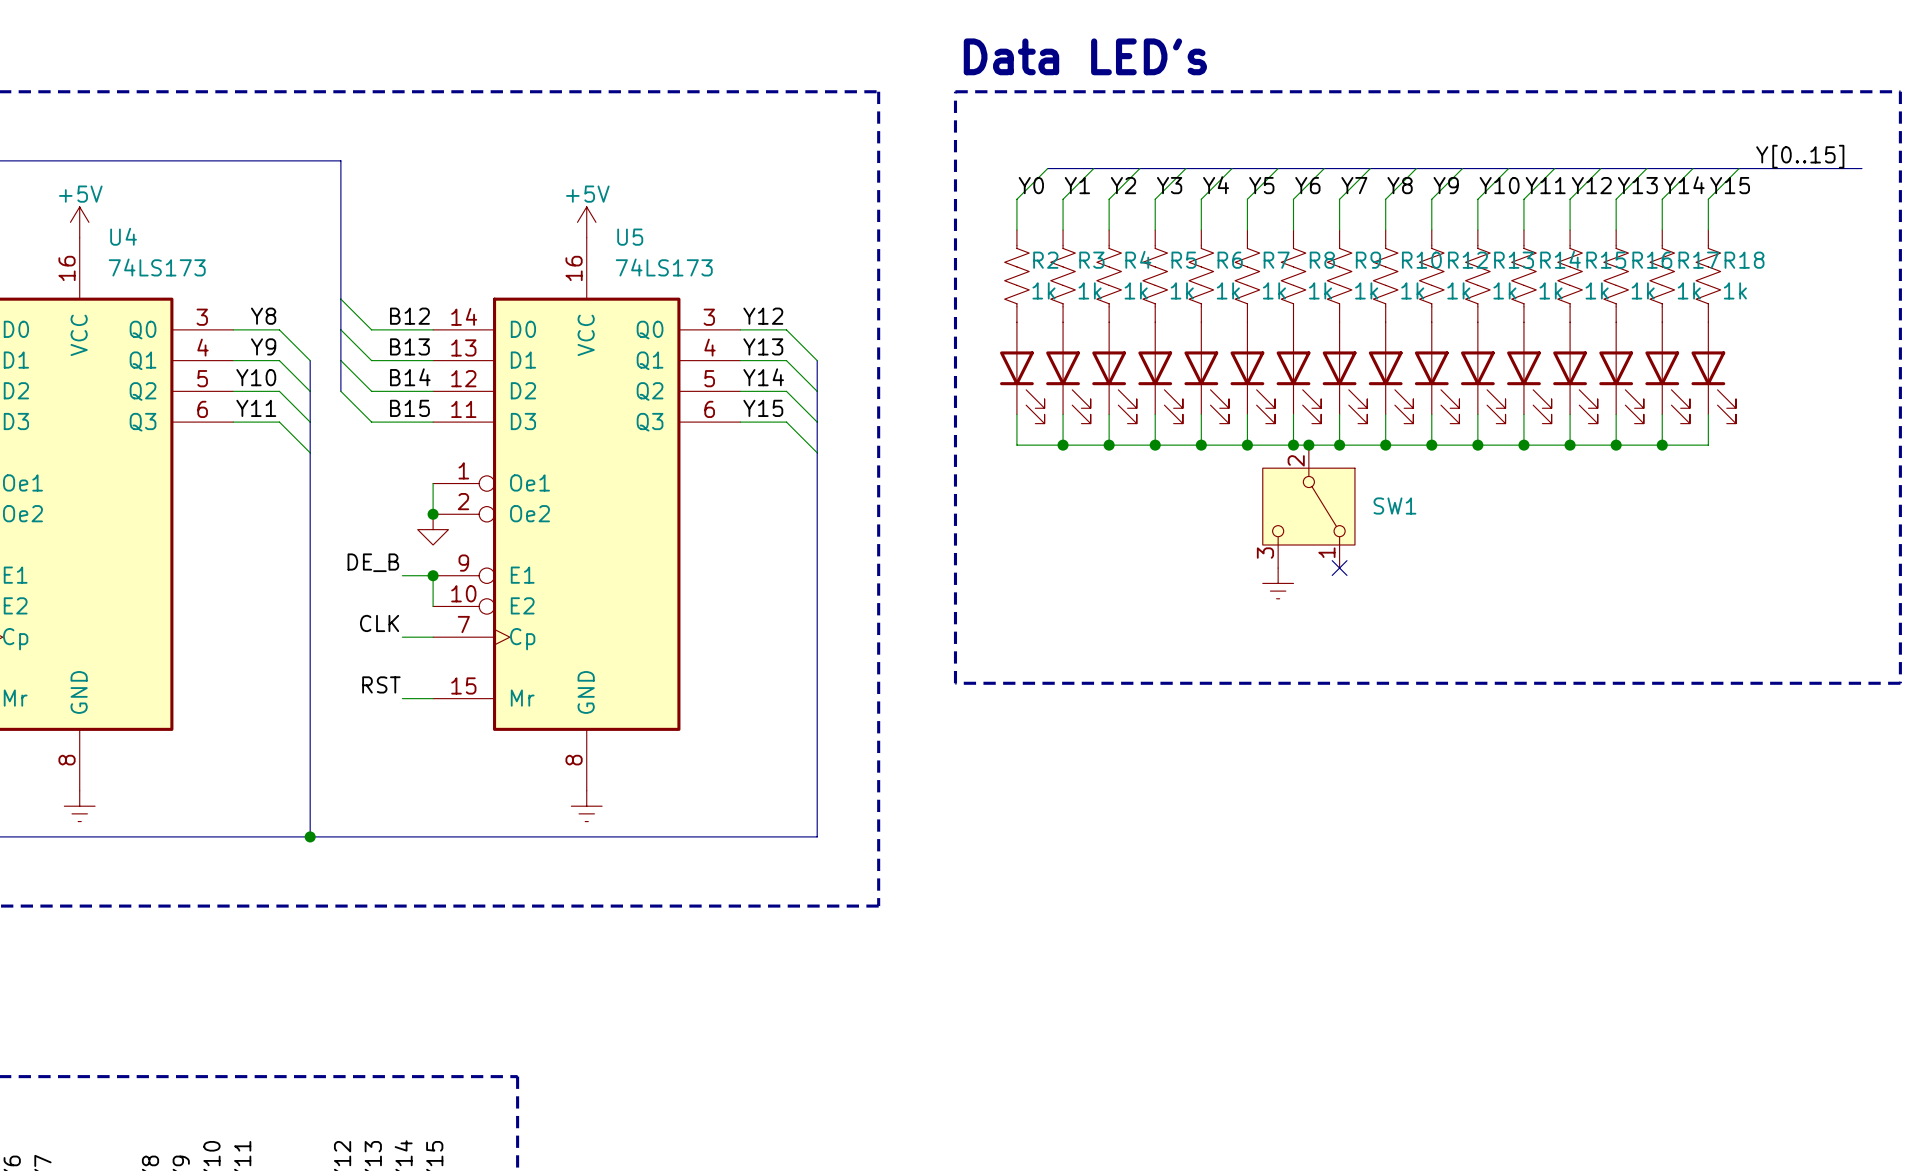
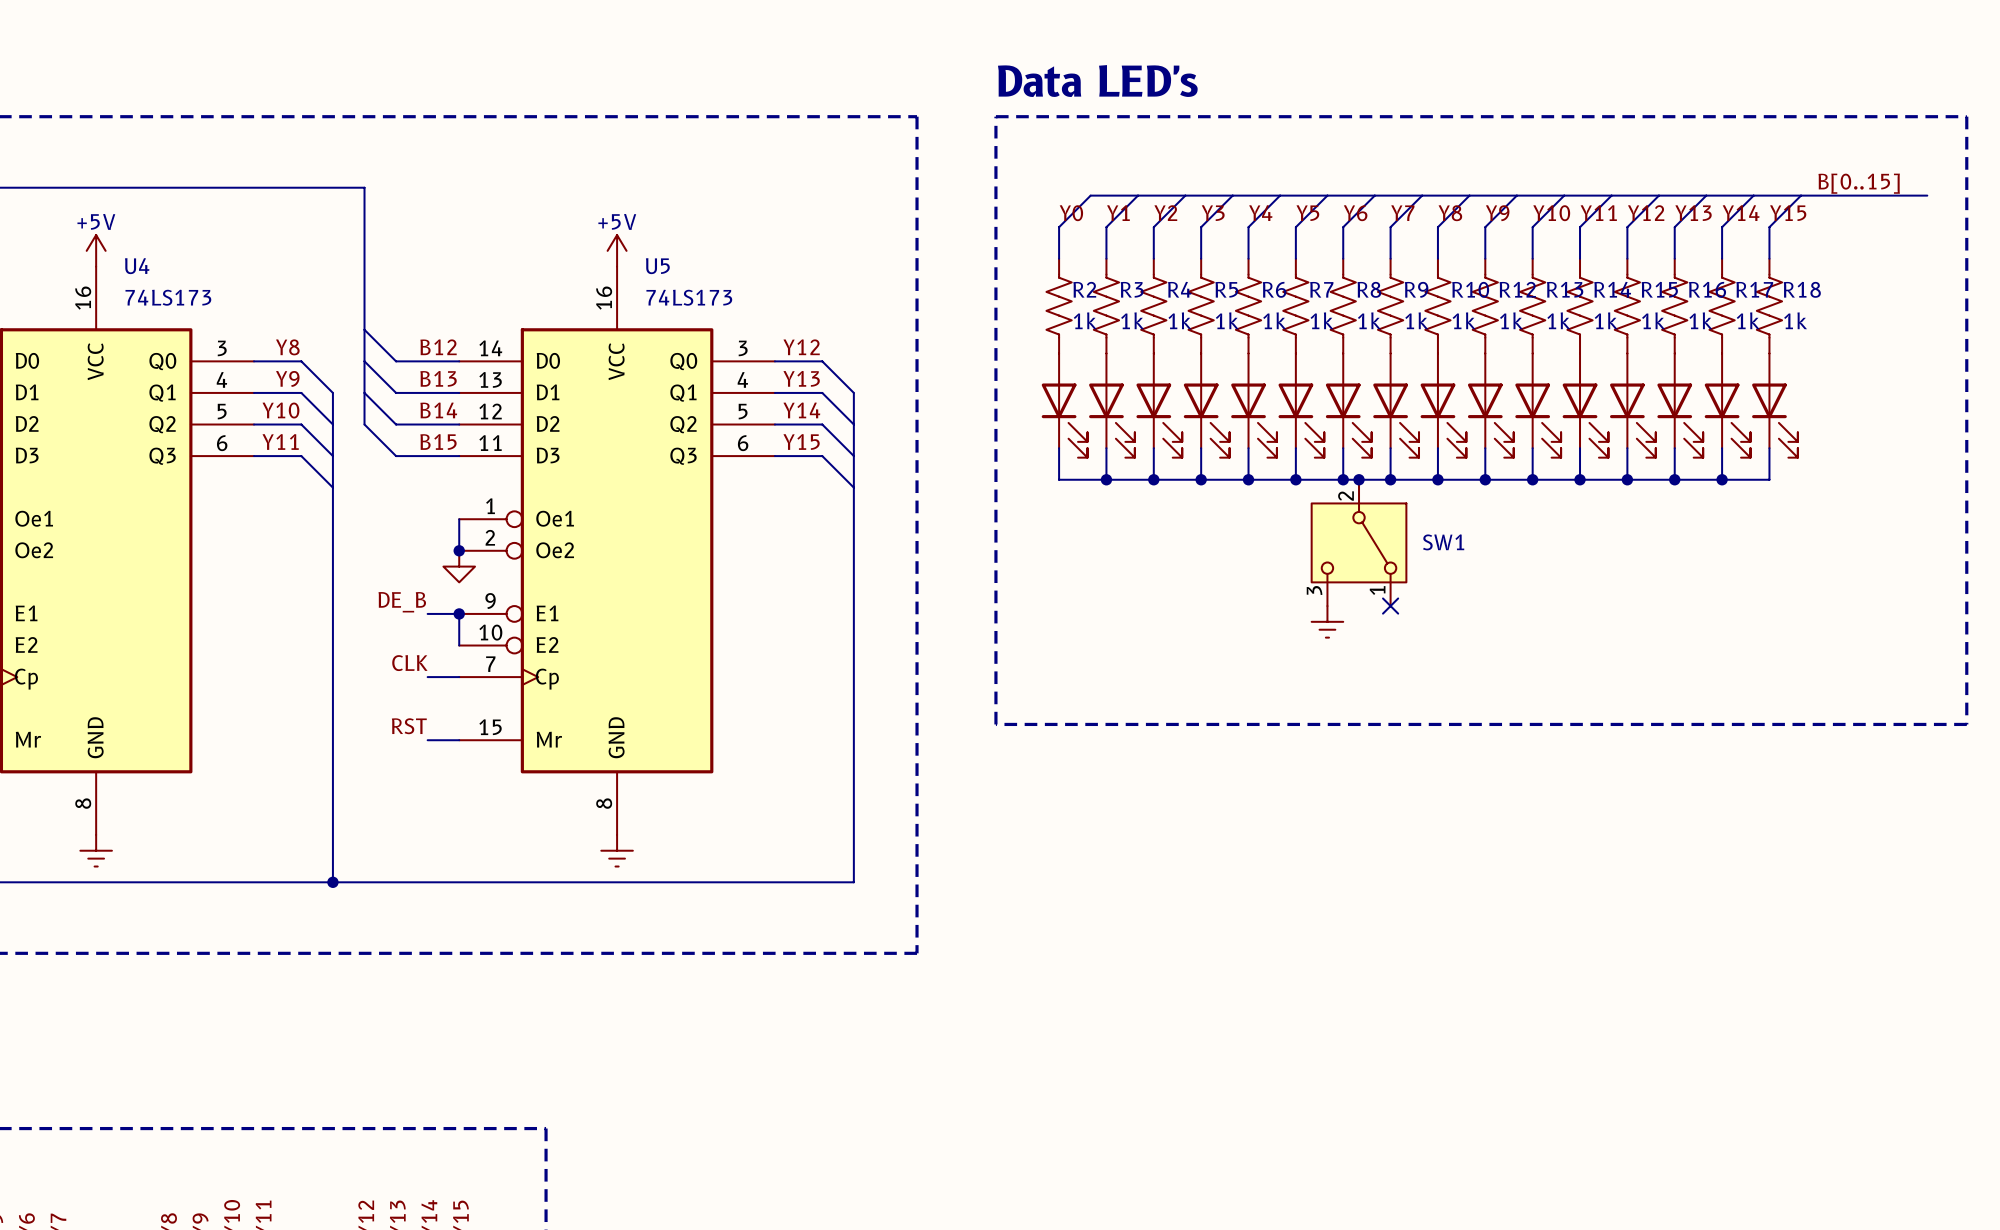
label: Y[0..15] (1800, 156) -> B[0..15] (1859, 183)

